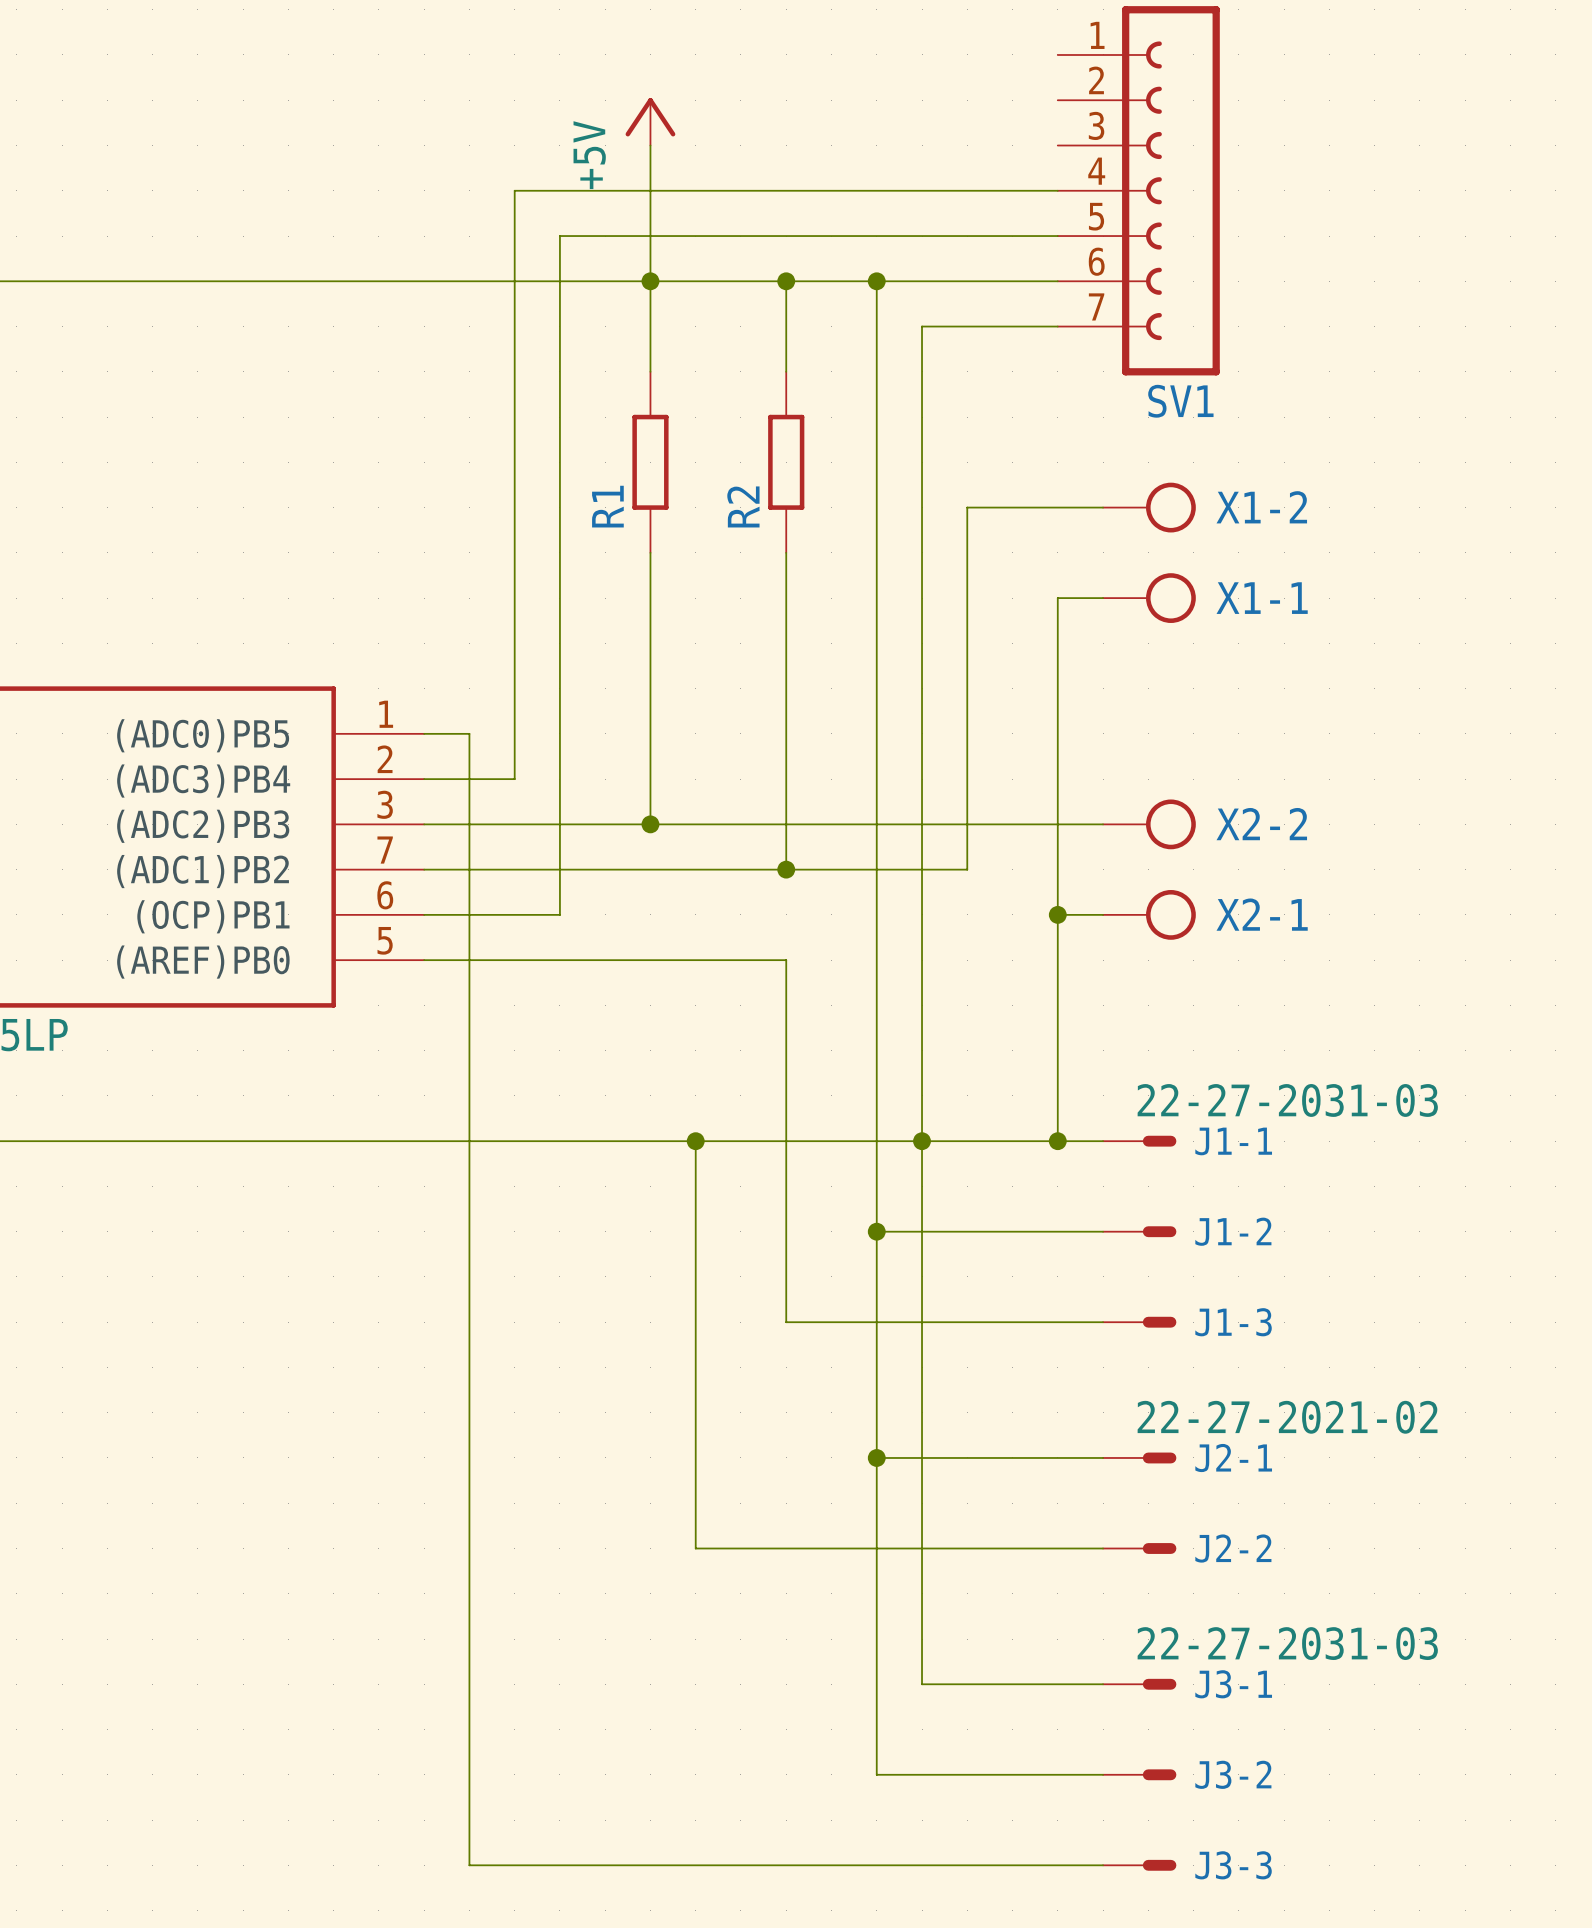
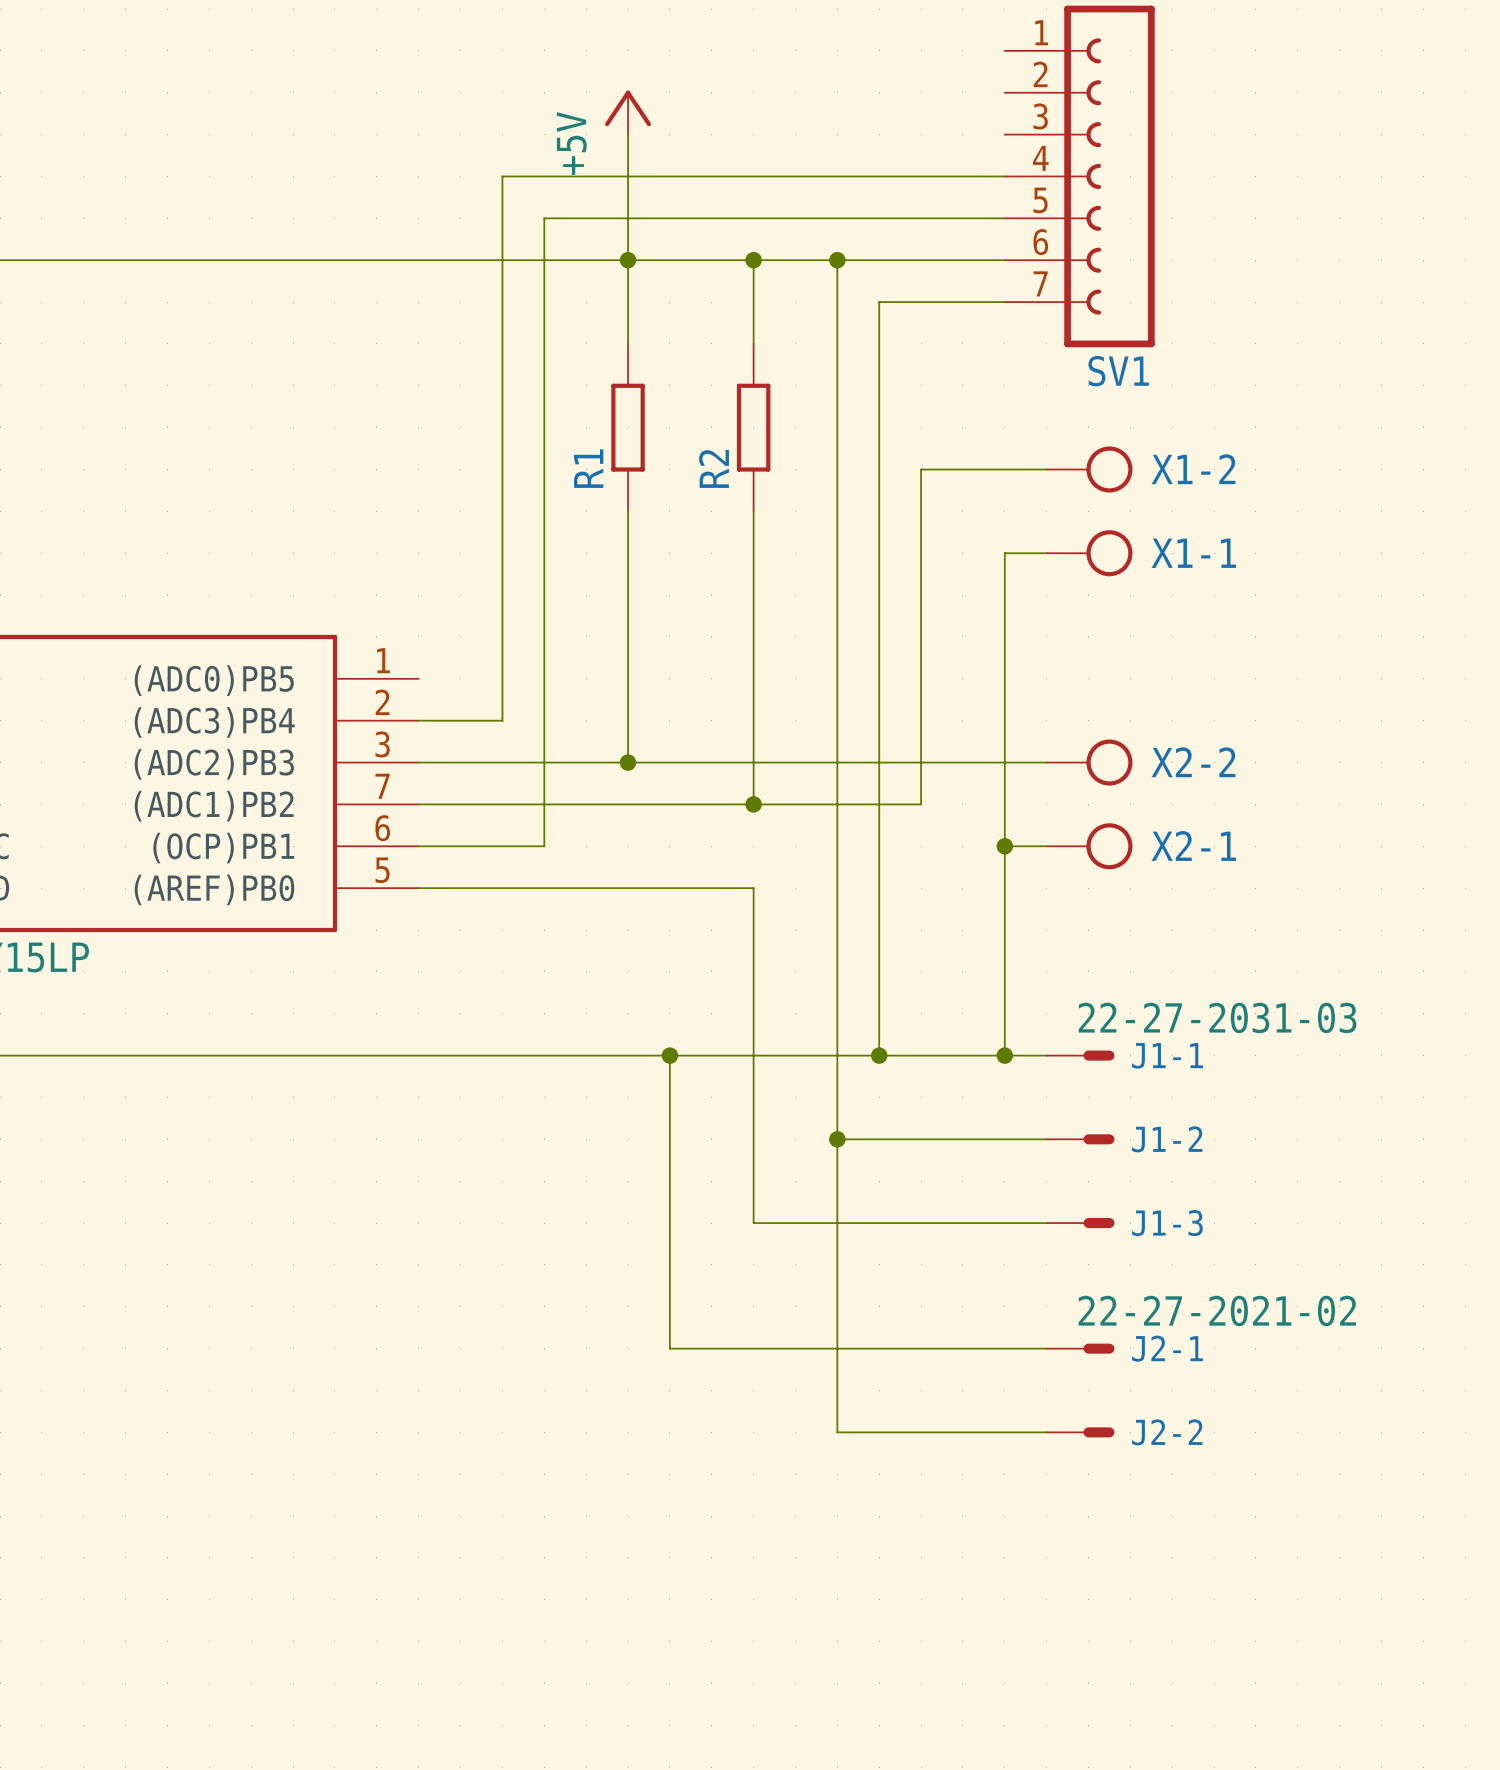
wire: (424, 733) (469, 733) (469, 1865) (1103, 1865) -> none
wire: (922, 1141) (922, 1684) (1103, 1684) -> none
wire: (695, 1457) (695, 1548) (876, 1548) (876, 1774) (1103, 1774) -> (669, 1348) (837, 1348)
junction: (876, 1457) -> none
J3-1: 22-27-2031-03 (1139, 1684) -> none
J3-2: (1139, 1774) -> none
J3-3: (1139, 1865) -> none

